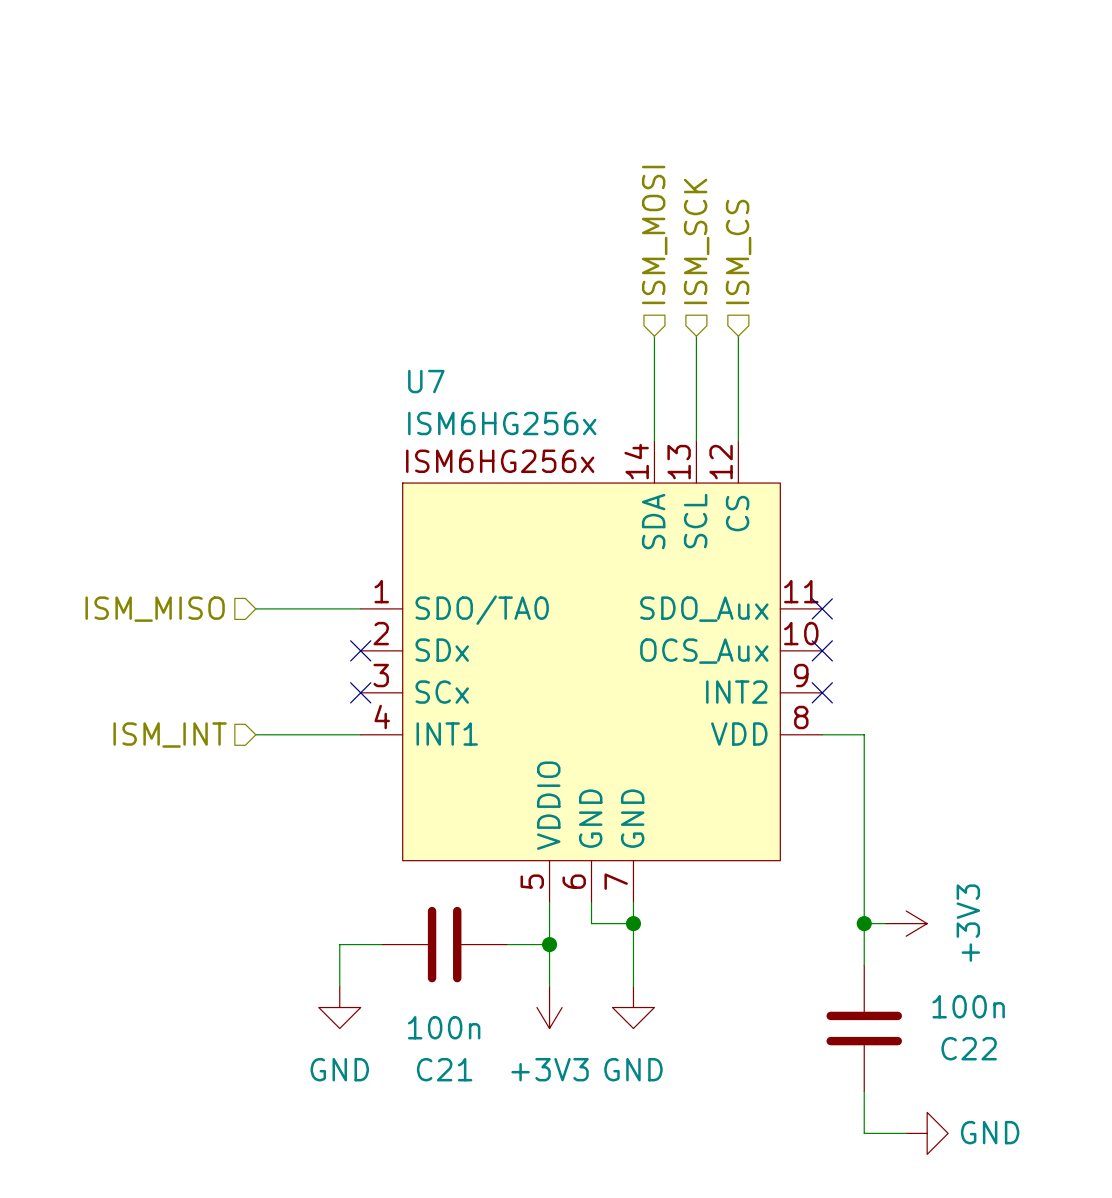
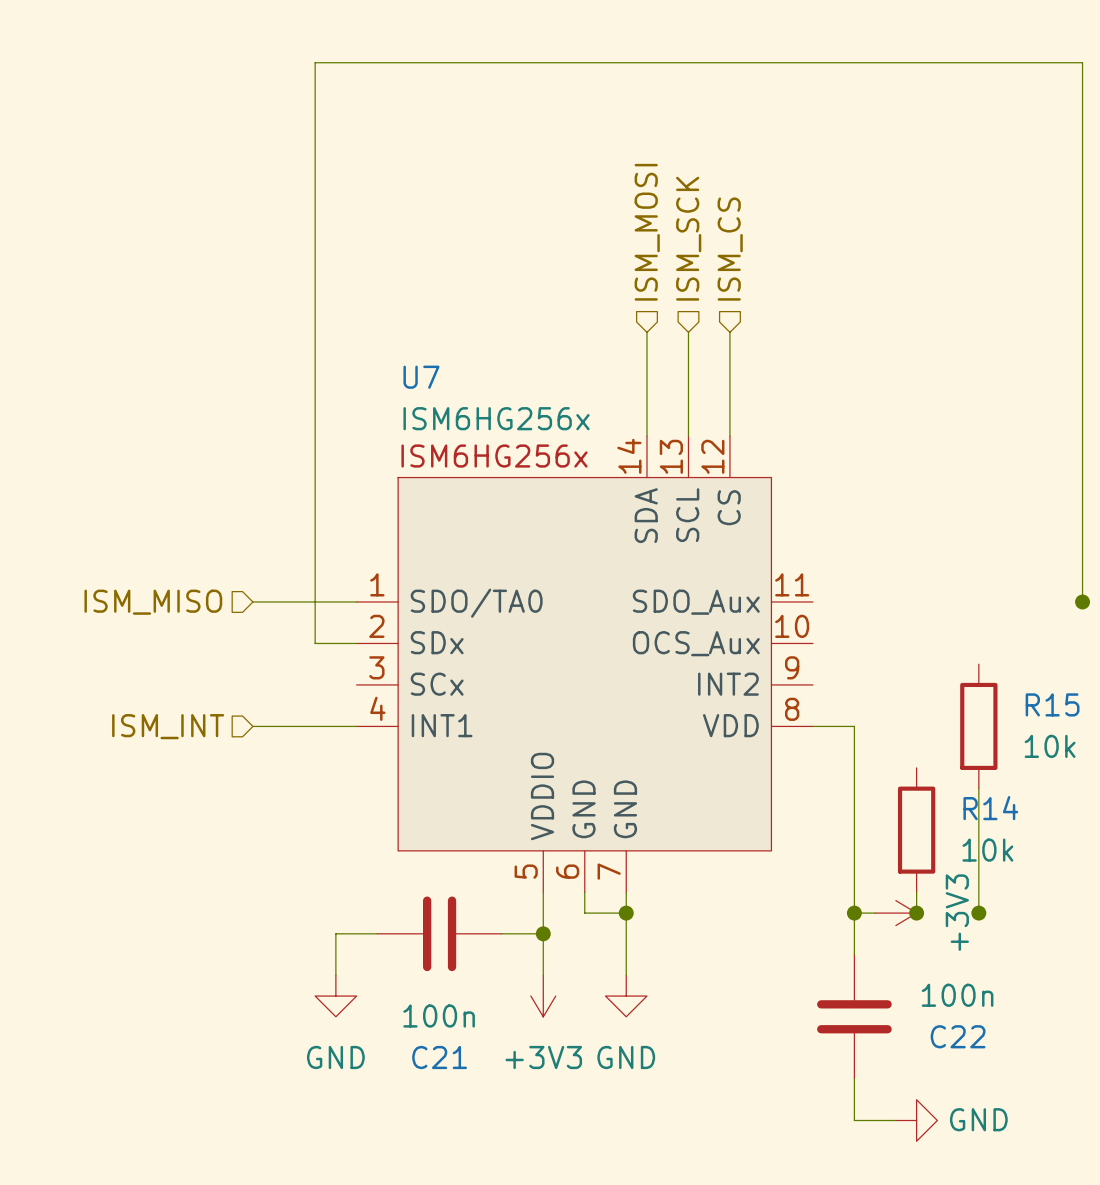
no-connect mark: (822, 608) -> none
wire: none -> (1082, 601) (1082, 62) (315, 62) (315, 643) (356, 643)
junction: none -> (1082, 601)
no-connect mark: (360, 650) -> none
no-connect mark: (822, 650) -> none
no-connect mark: (360, 692) -> none
no-connect mark: (822, 692) -> none
R15: none -> 10k (978, 726)
wire: none -> (978, 788) (978, 913)
R14: none -> 10k (916, 830)
wire: none -> (916, 892) (916, 913)
junction: none -> (916, 913)
junction: none -> (978, 913)

